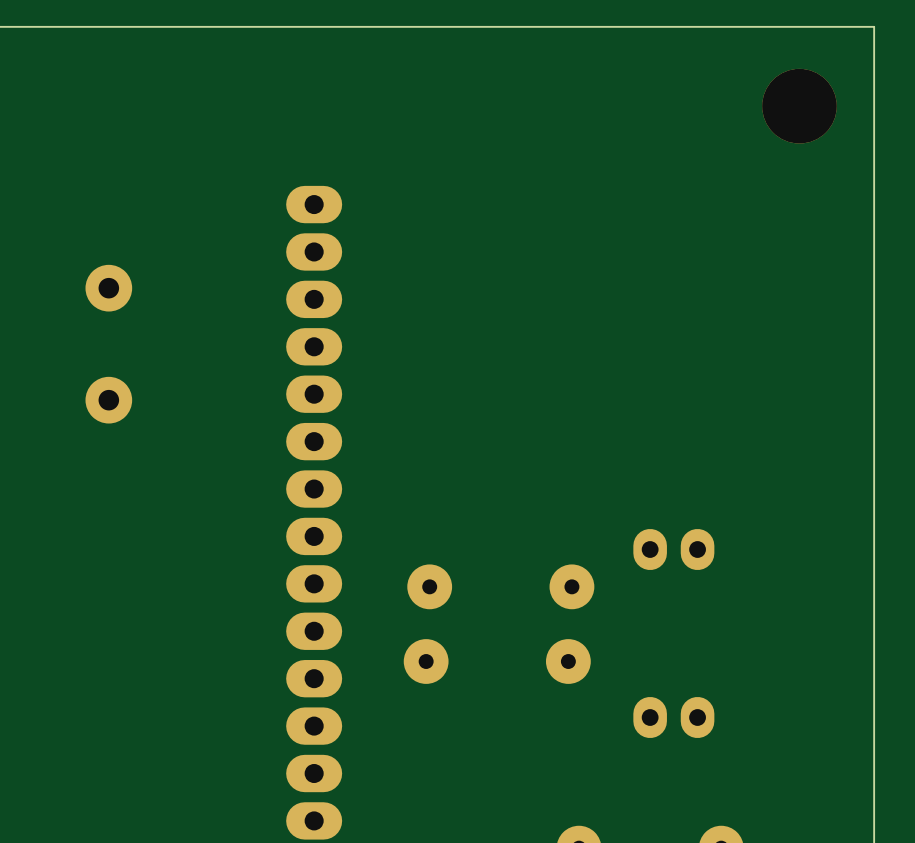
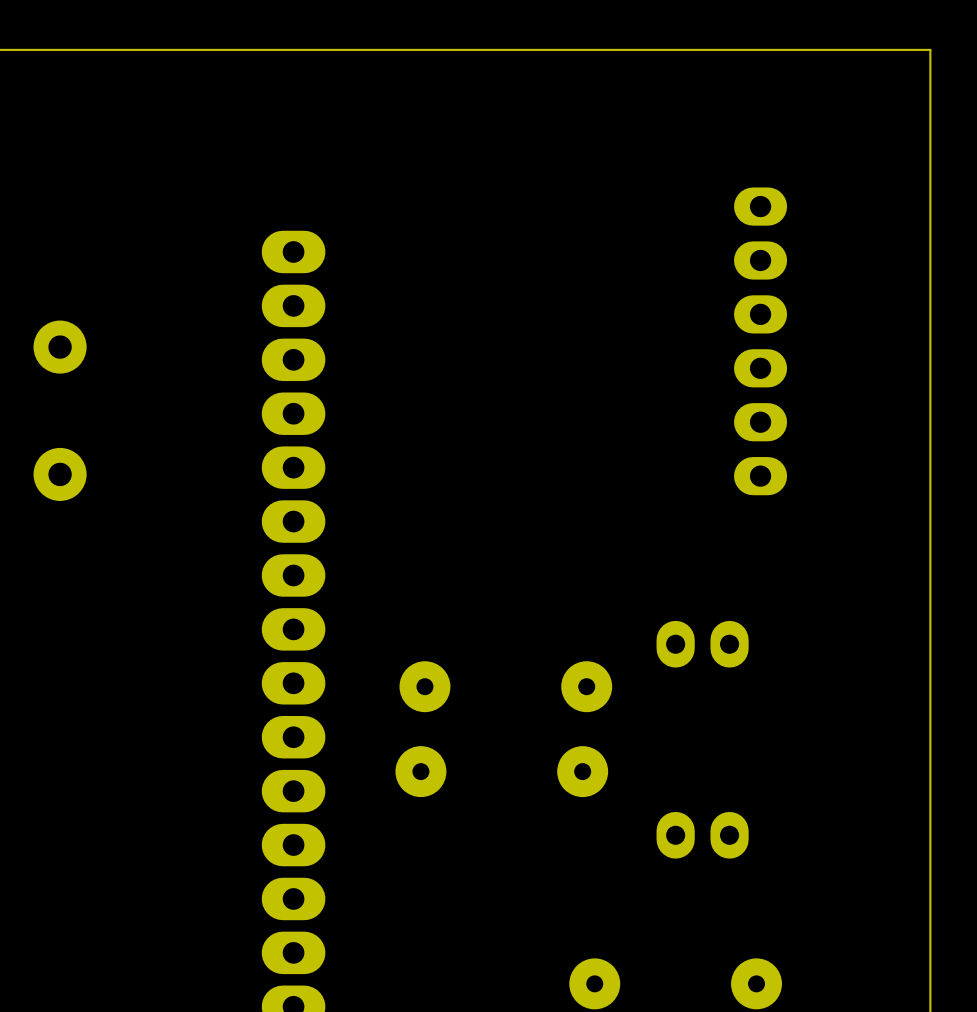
part: (799, 106) -> none
part: none -> (760, 341)

